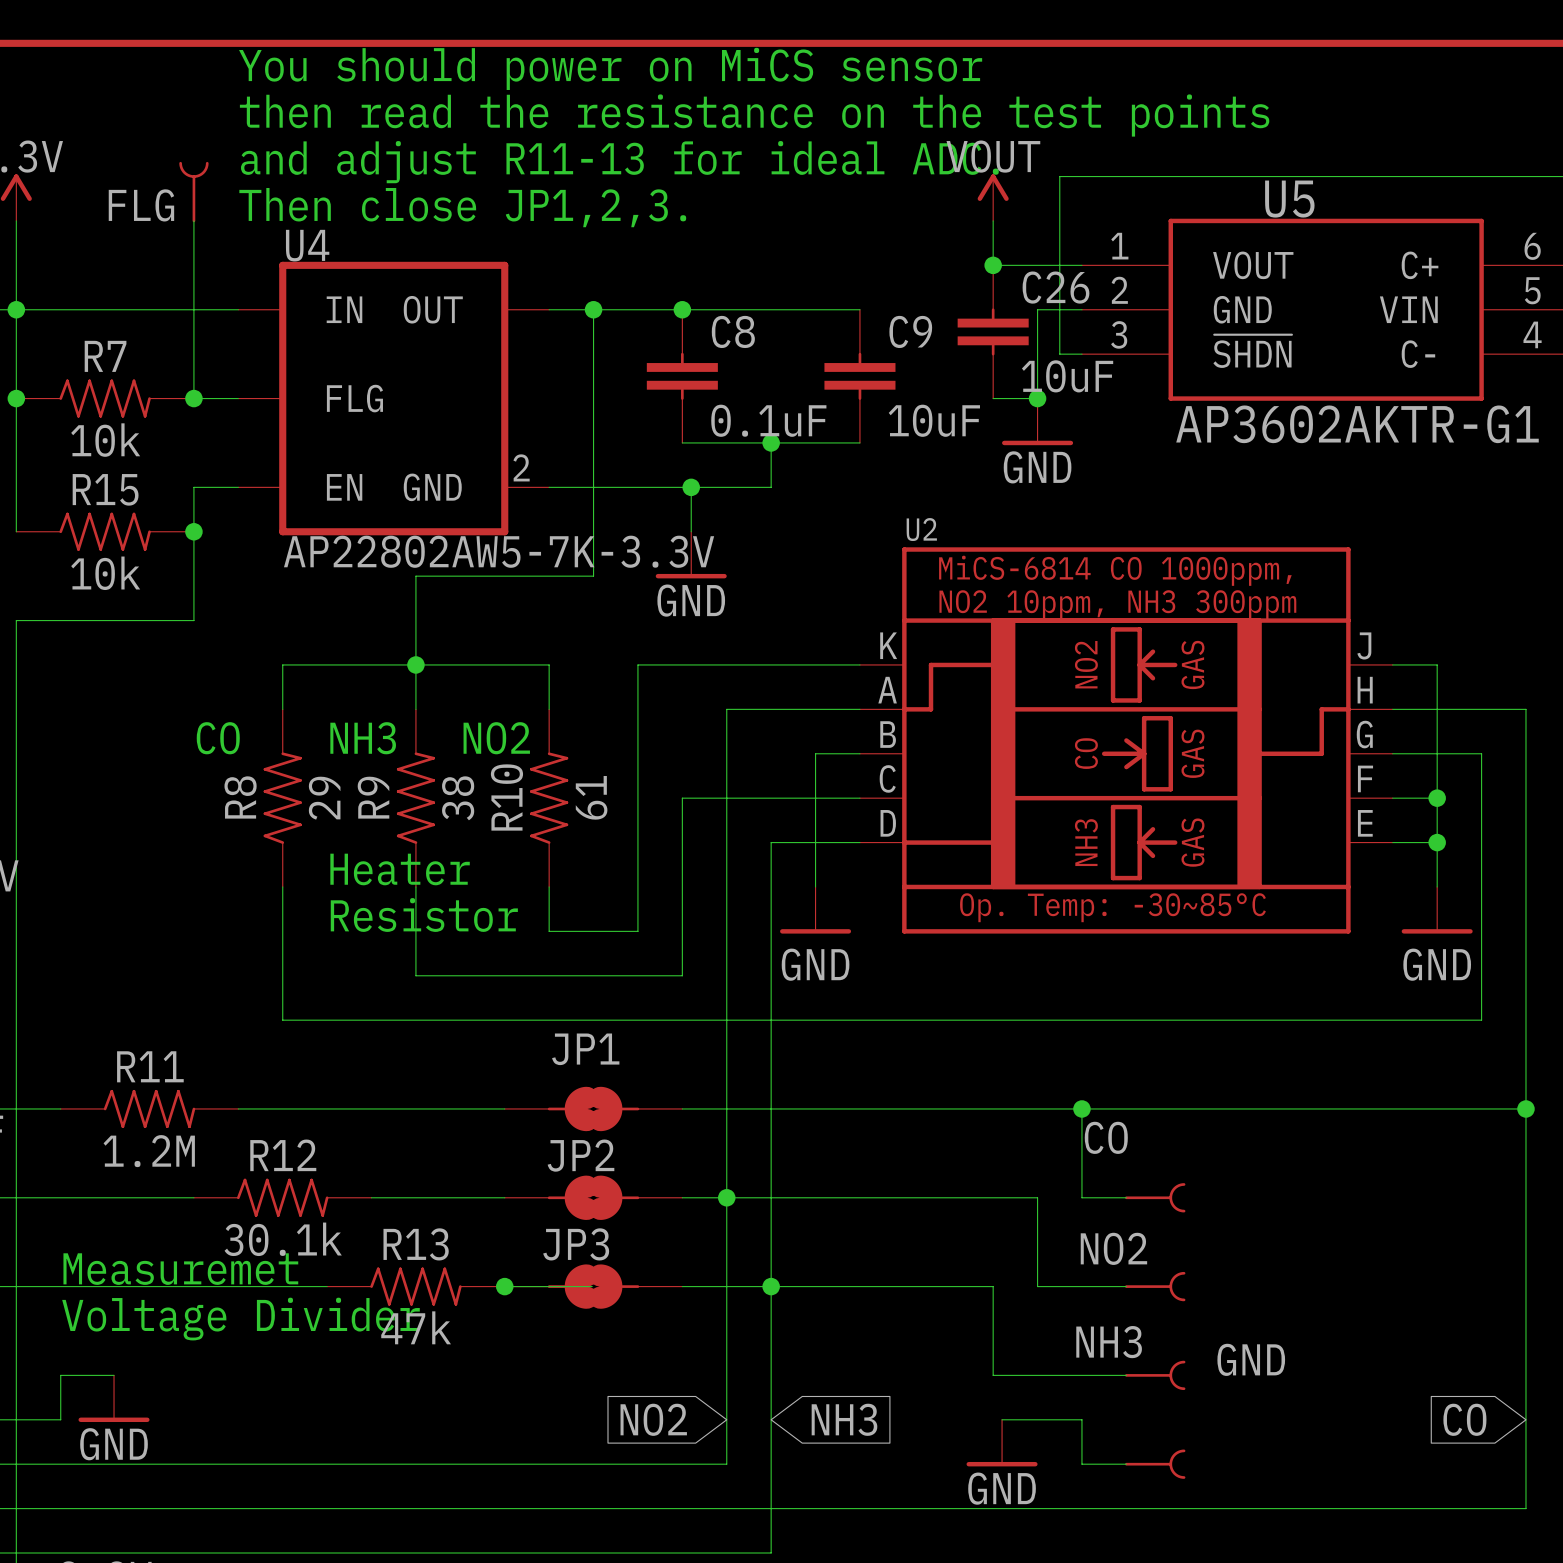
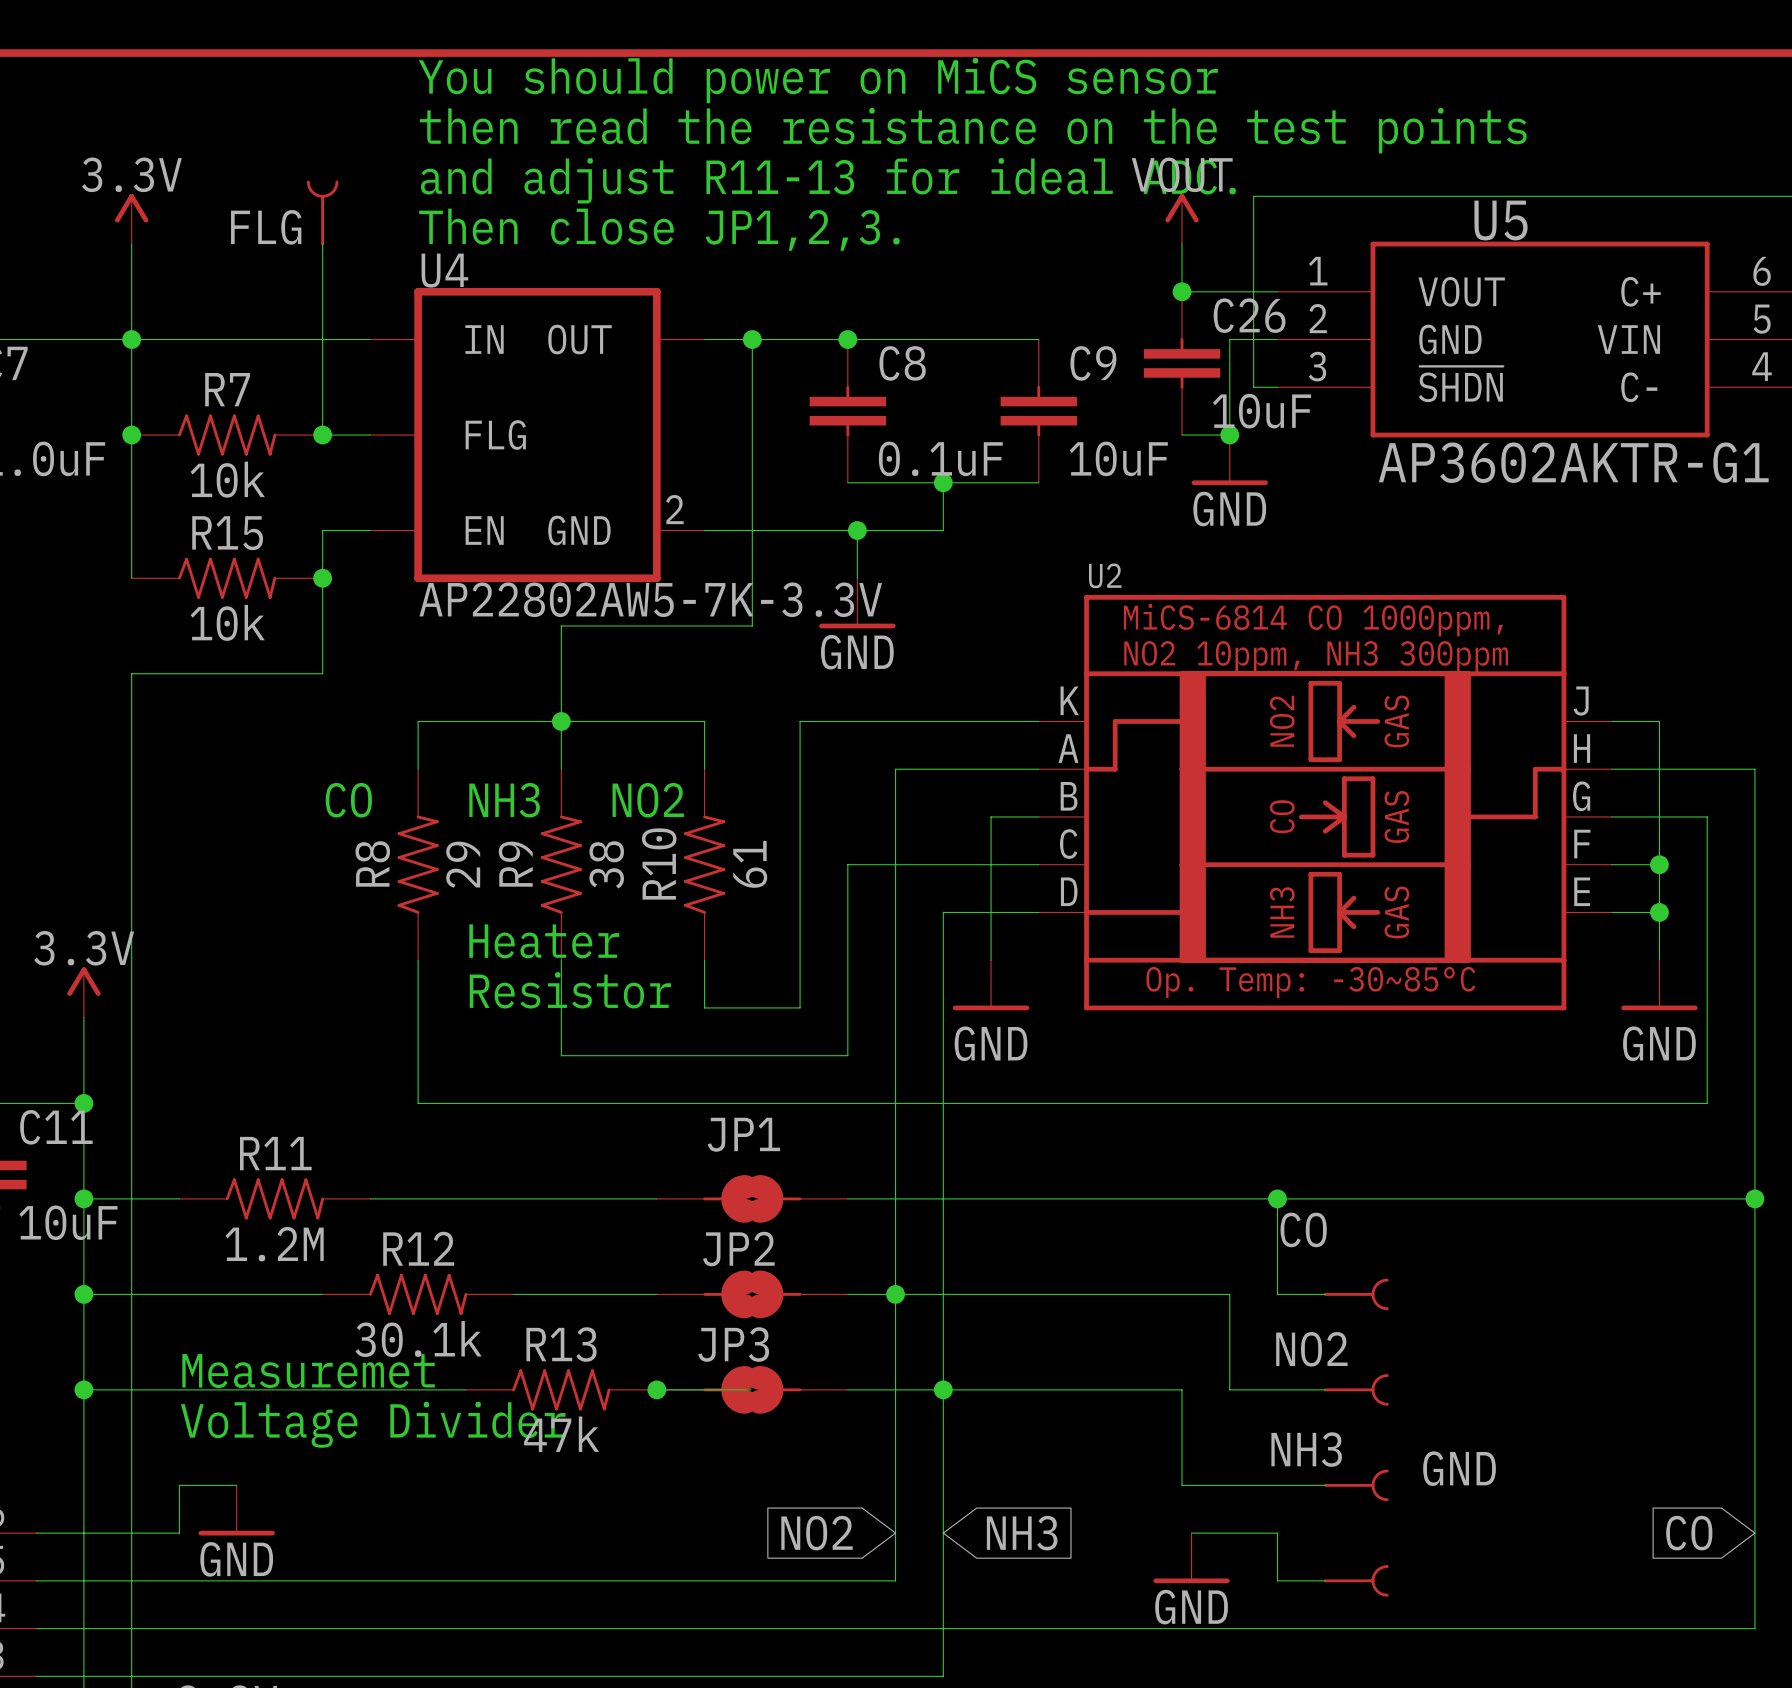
text position: You should power on MiCS sensor (610, 68) -> You should power on MiCS sensor (818, 80)
text position: then read the resistance on the test points (754, 115) -> then read the resistance on the test points (973, 130)
text position: and adjust R11-13 for ideal ADC. (619, 162) -> and adjust R11-13 for ideal ADC. (828, 180)
text position: Then close JP1,2,3. (462, 207) -> Then close JP1,2,3. (659, 229)

